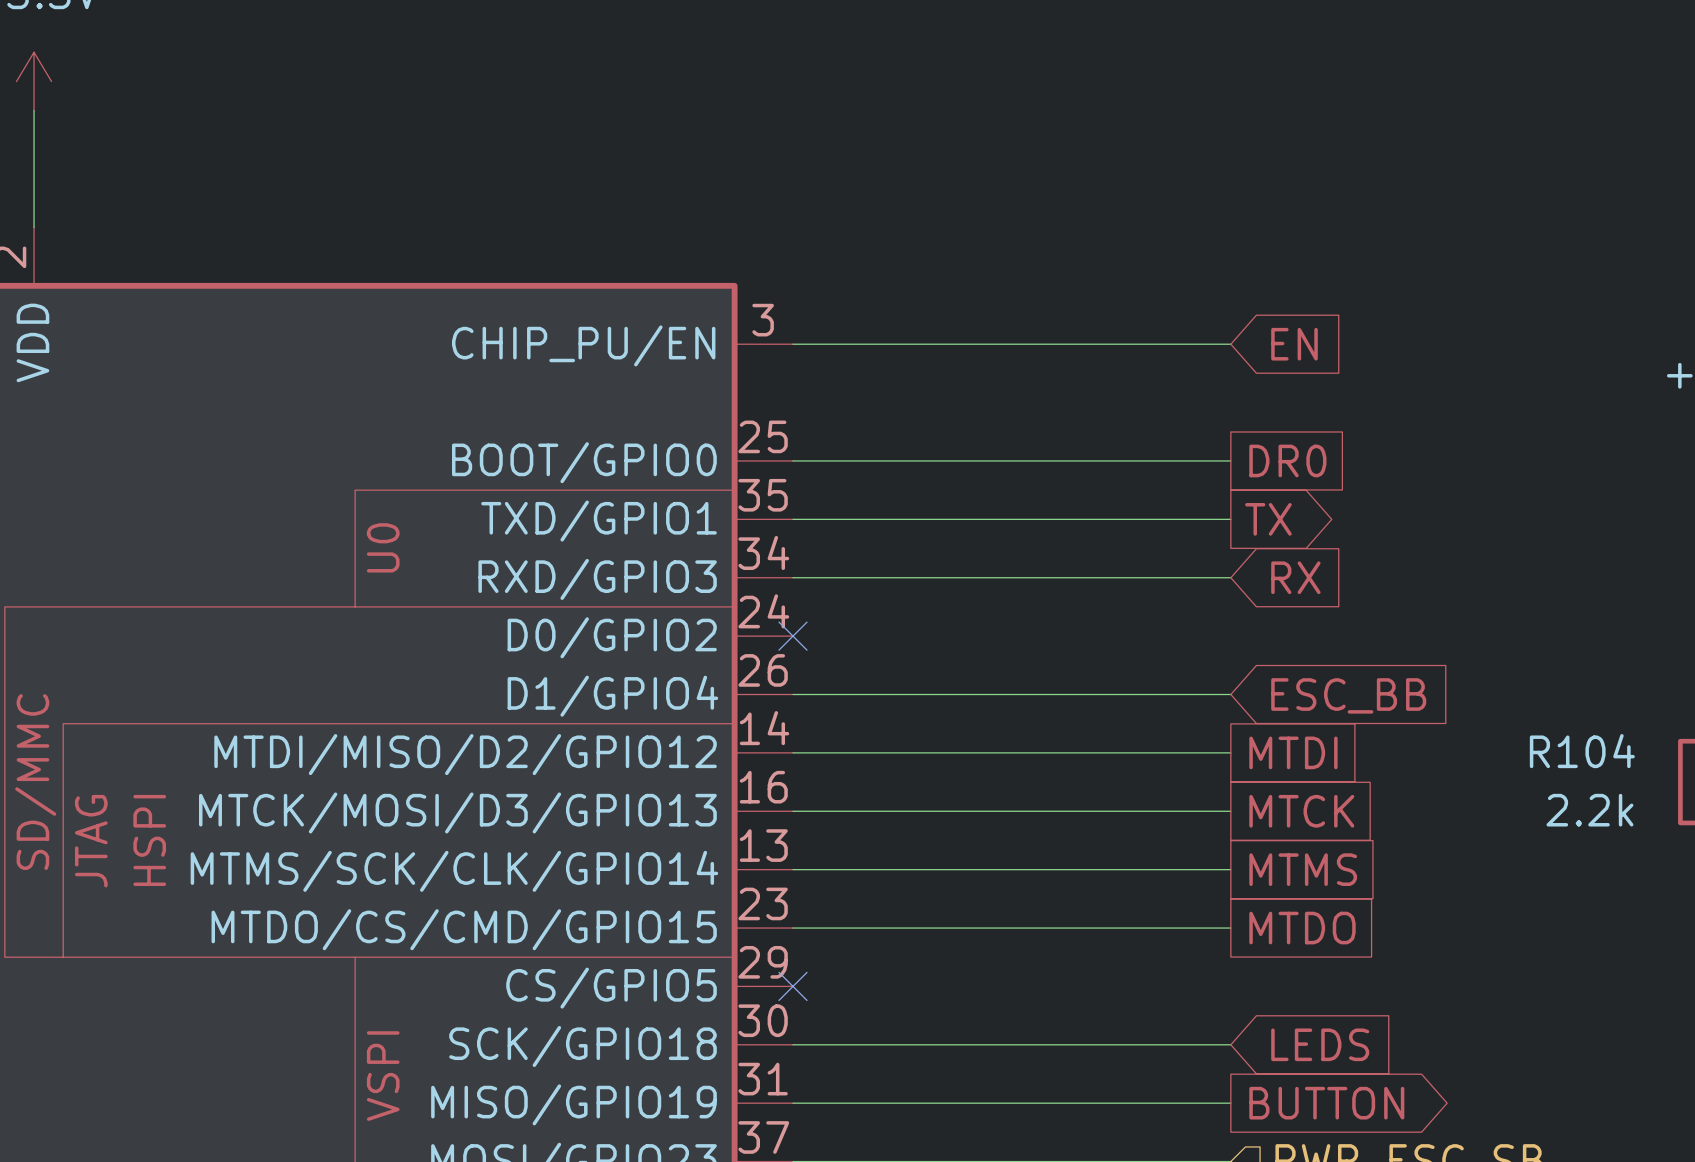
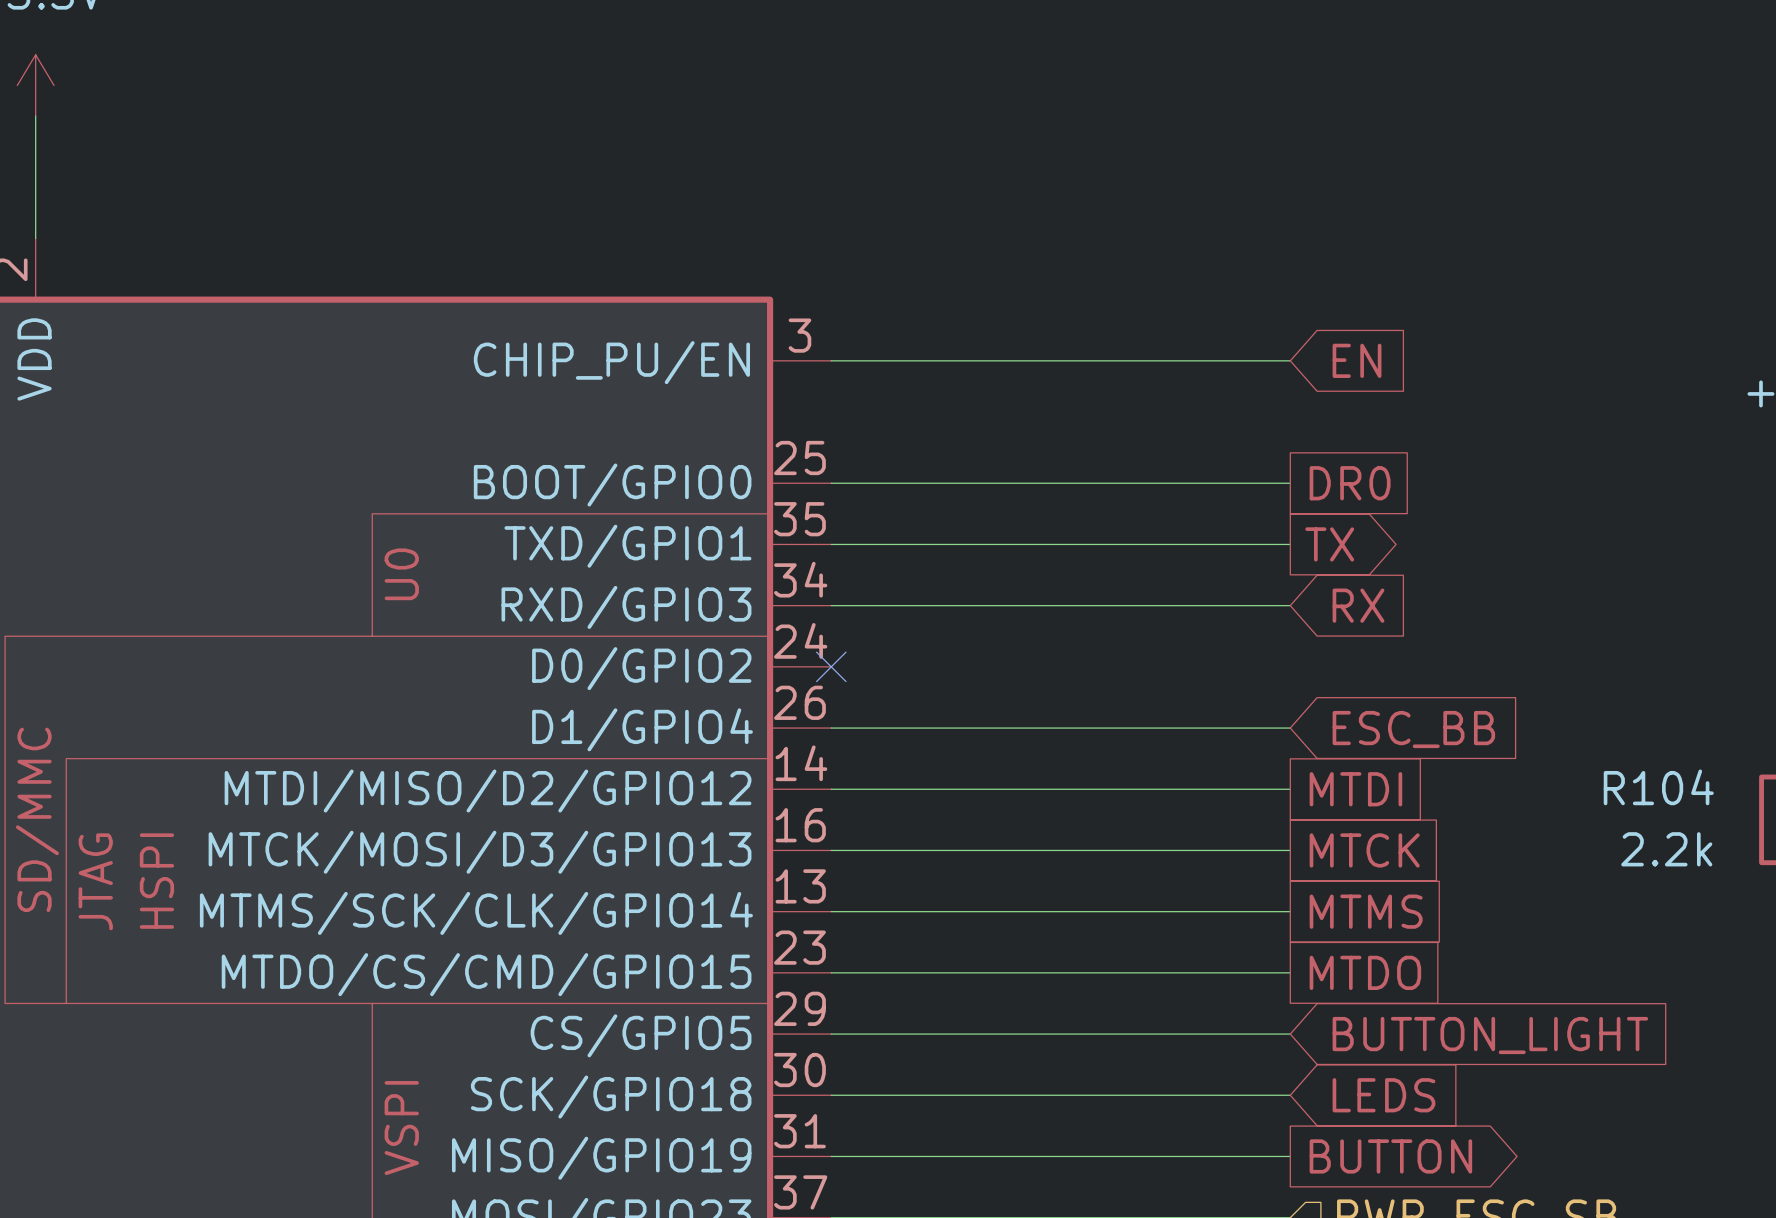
wire: none -> (831, 1034) (1290, 1034)
no-connect mark: (792, 986) -> none
global label: none -> BUTTON_LIGHT (1490, 1035)

